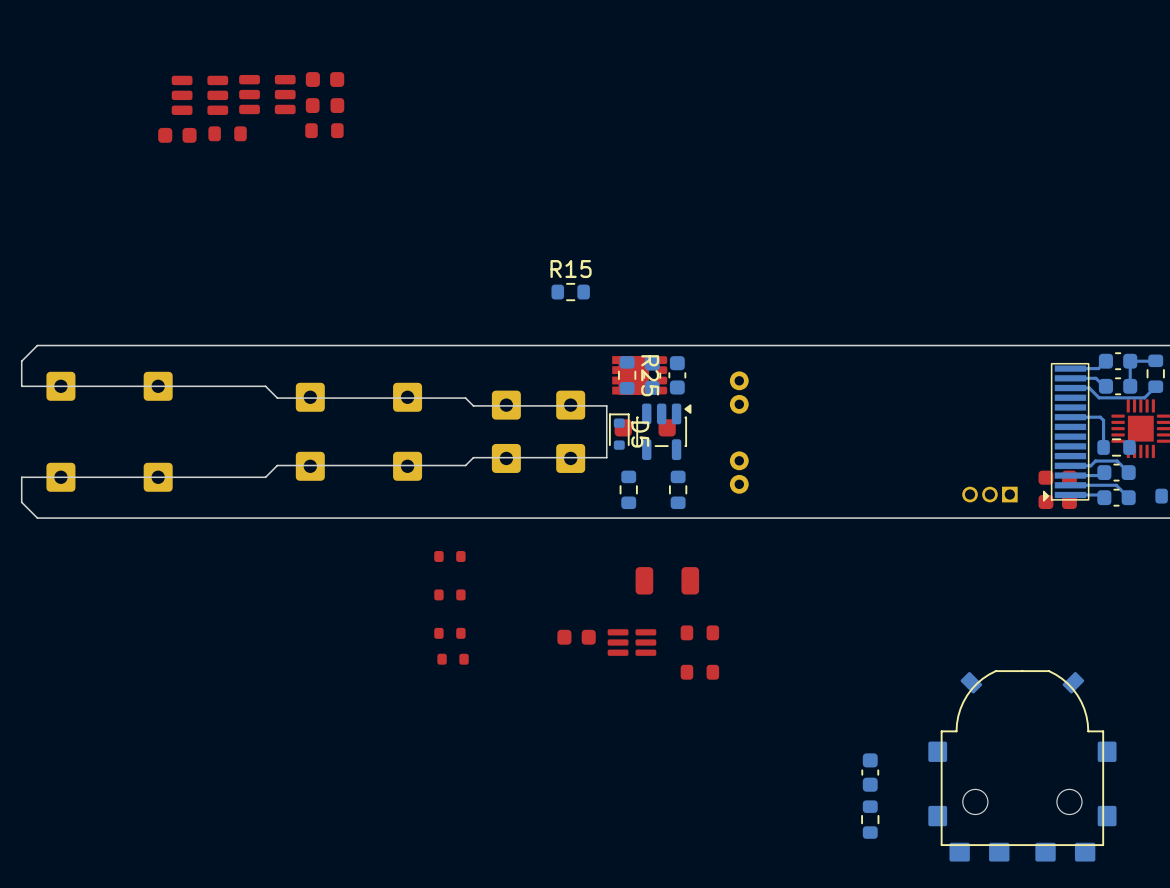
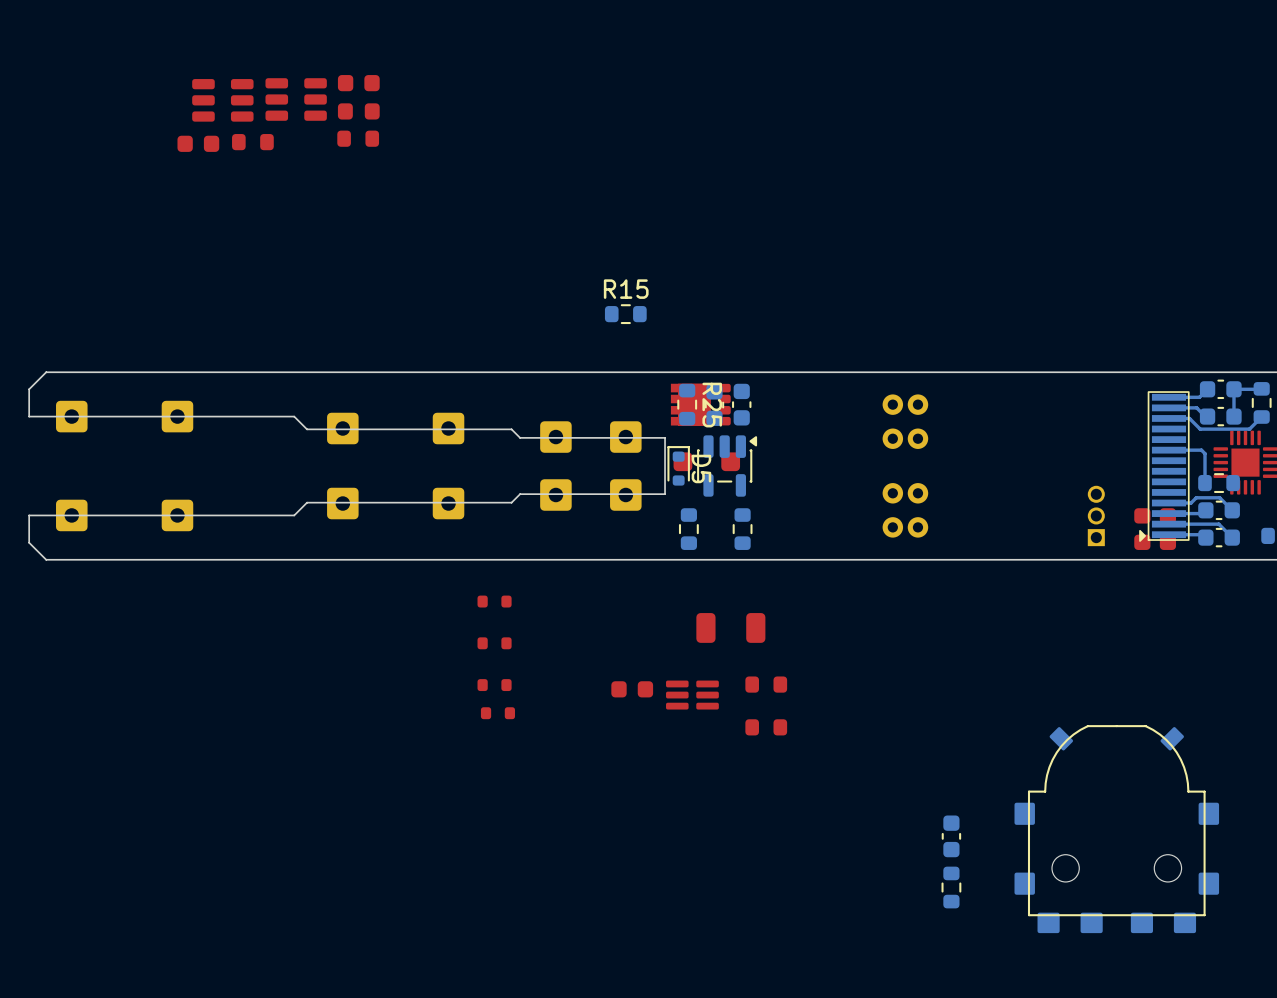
part: none -> (892, 421)
part: none -> (917, 421)
part: (739, 392) -> none
part: (739, 472) -> none
part: none -> (892, 510)
part: none -> (917, 510)
part rotation: 0° (989, 494) -> 90° clockwise (1096, 515)

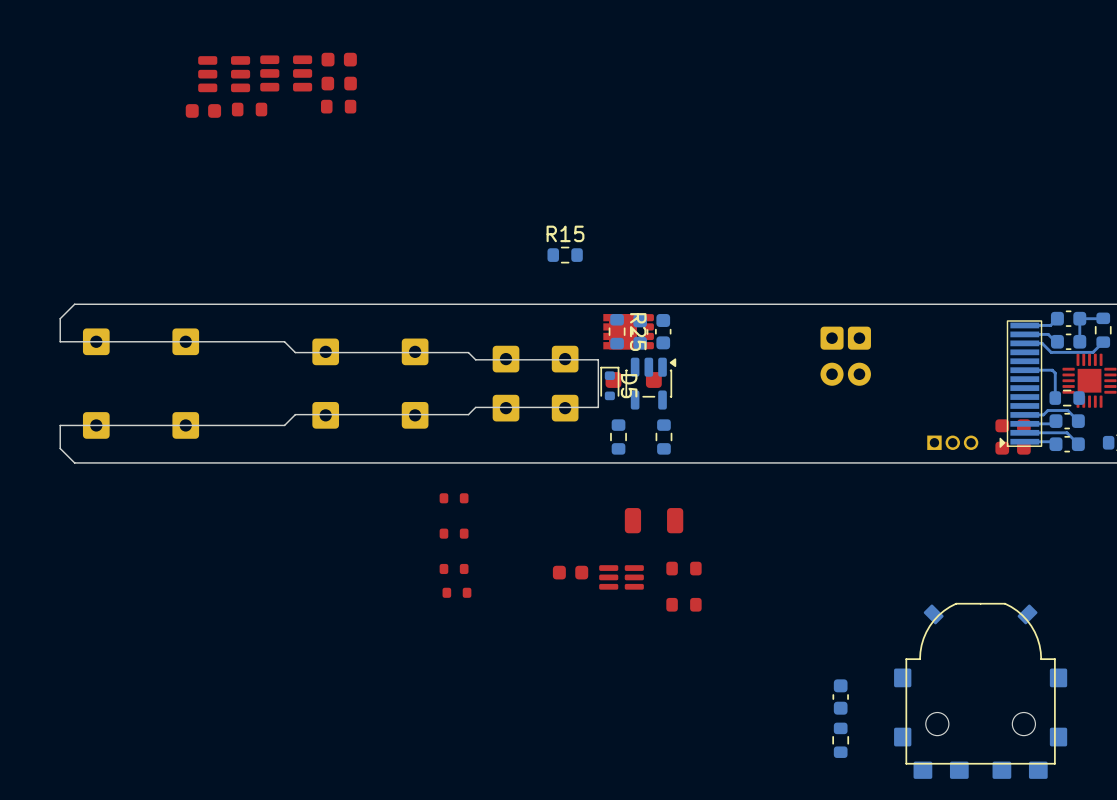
part: (892, 421) -> none
part: (917, 421) -> none
part: none -> (832, 356)
part: none -> (859, 356)
part: (892, 510) -> none
part: (917, 510) -> none
part rotation: 0° (1096, 515) -> 90° clockwise (952, 442)

